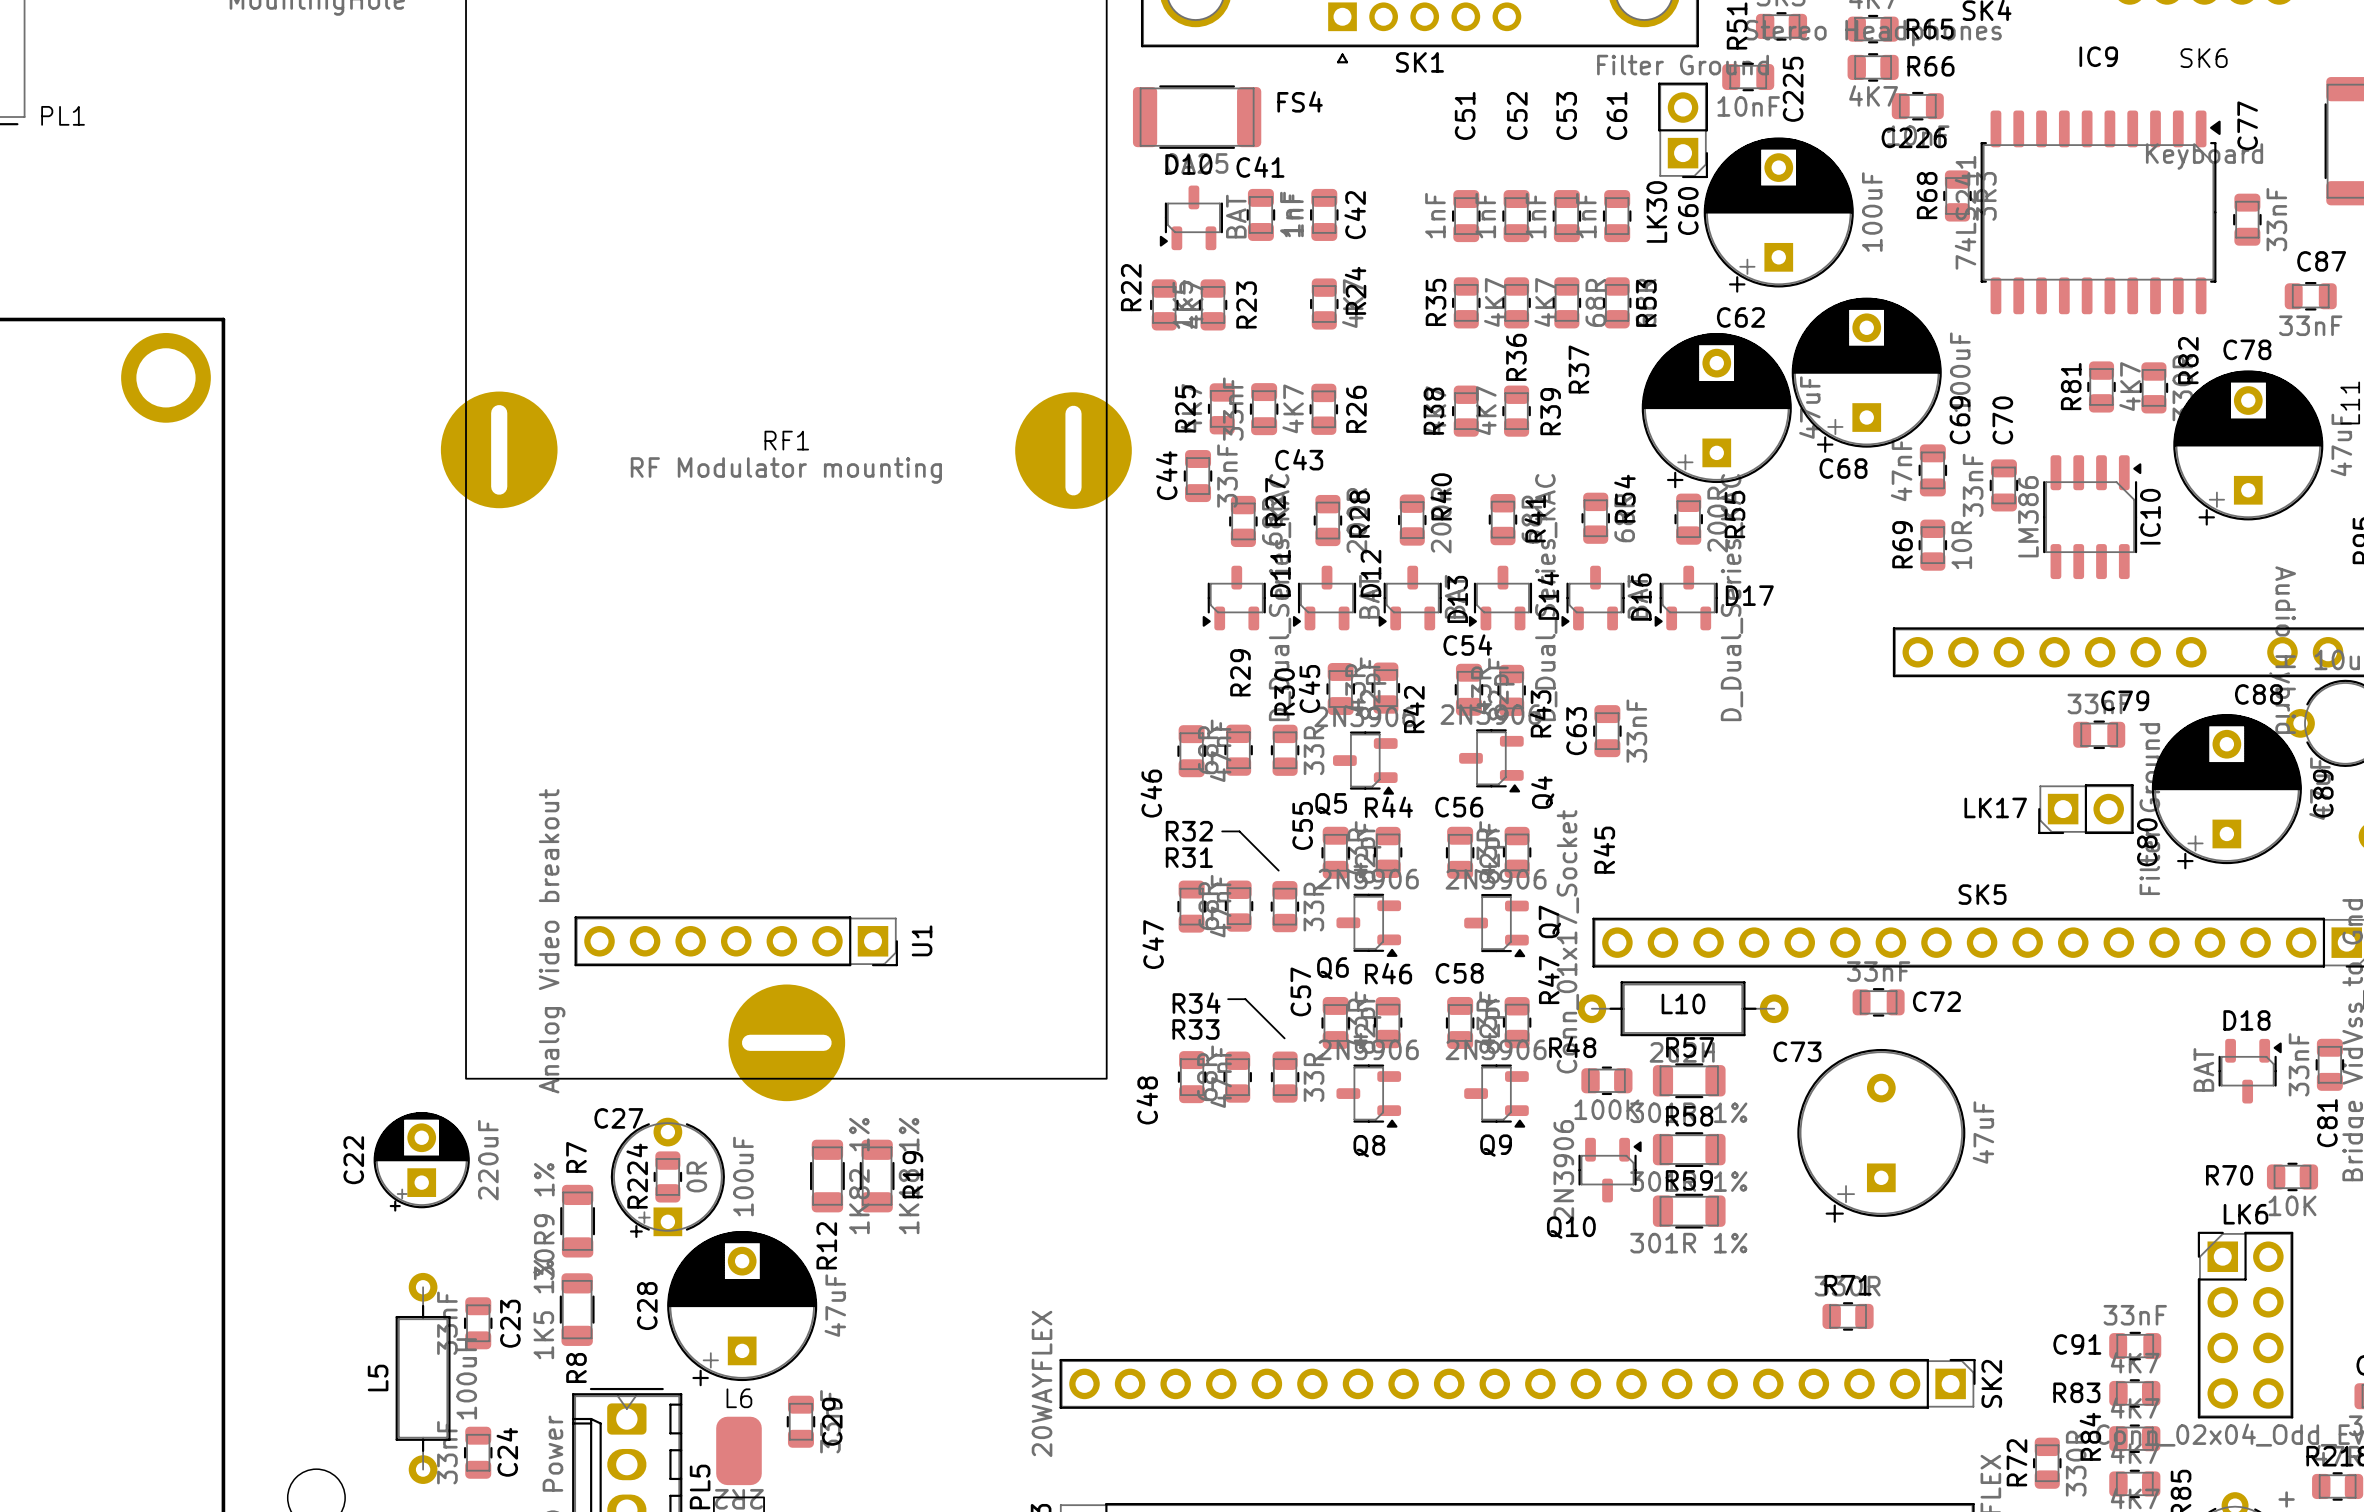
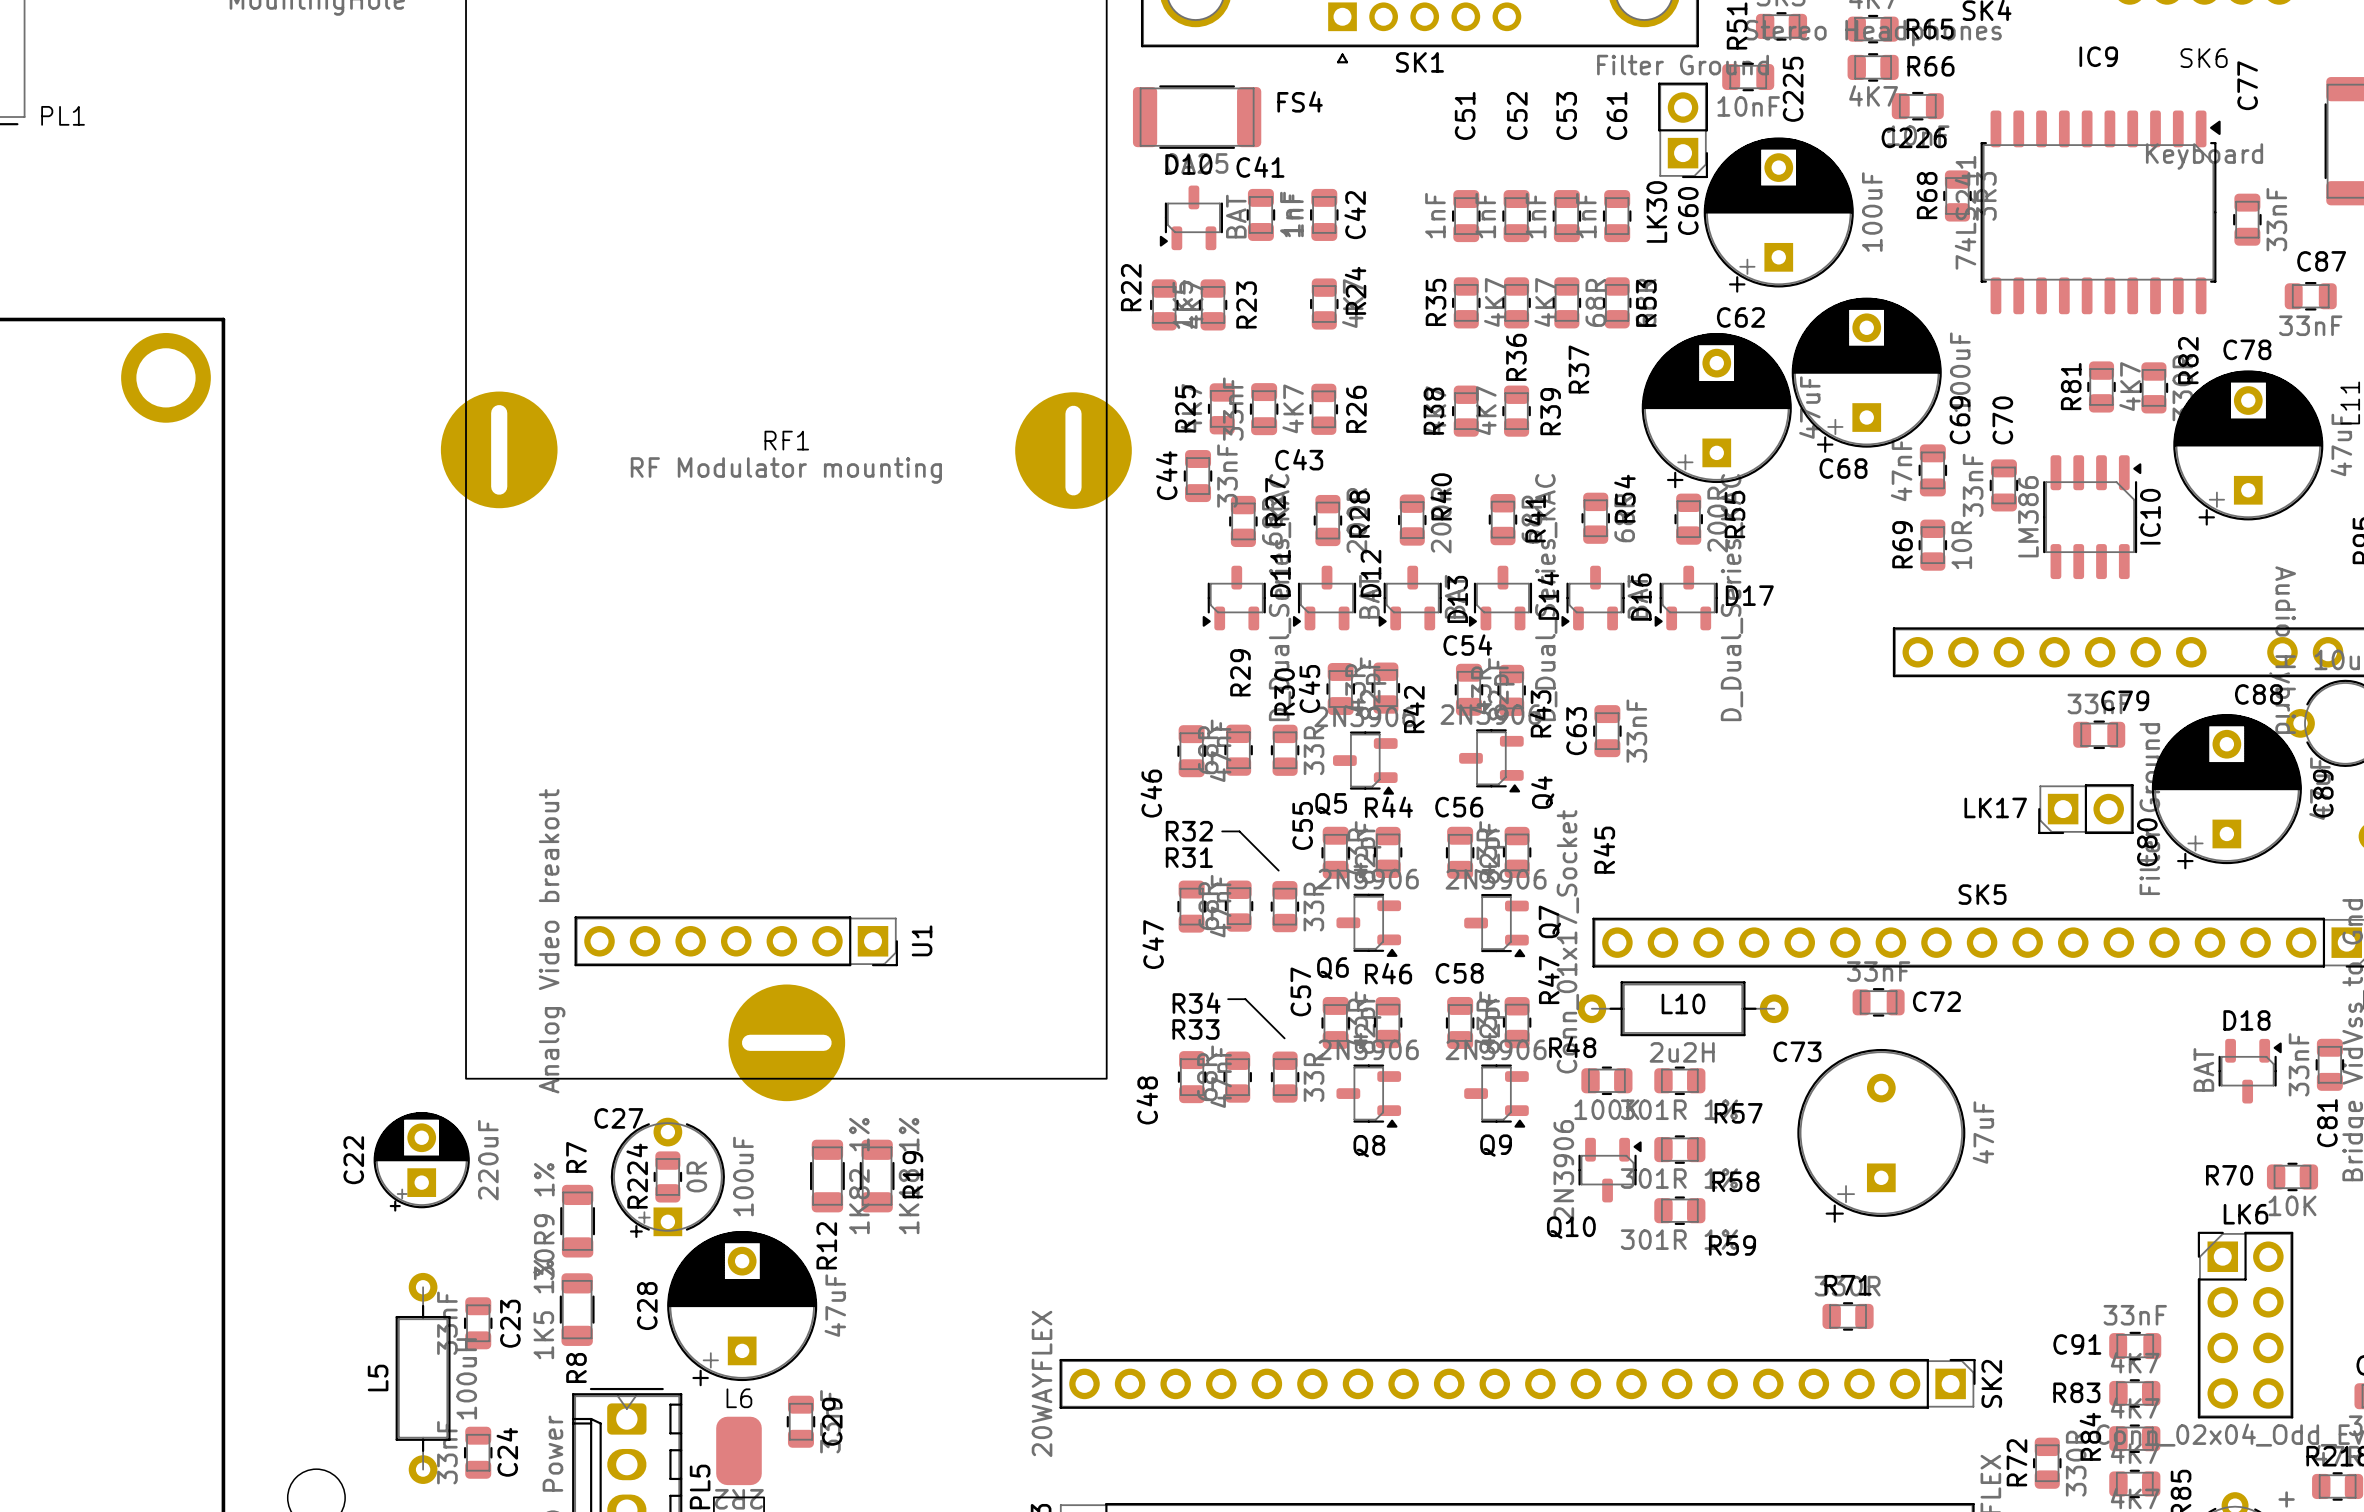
C77 name position: C77 (2247, 125) -> C77 (2247, 85)
R57 name position: R57 (1690, 1047) -> R57 (1738, 1113)
R57 footprint: [1652, 1063, 1726, 1099] -> [1654, 1066, 1706, 1096]
R58 name position: R58 (1689, 1116) -> R58 (1735, 1181)
R58 footprint: [1652, 1132, 1726, 1168] -> [1654, 1135, 1706, 1164]
R59 name position: R59 (1689, 1180) -> R59 (1732, 1245)
R59 footprint: [1652, 1193, 1726, 1229] -> [1654, 1196, 1706, 1225]

